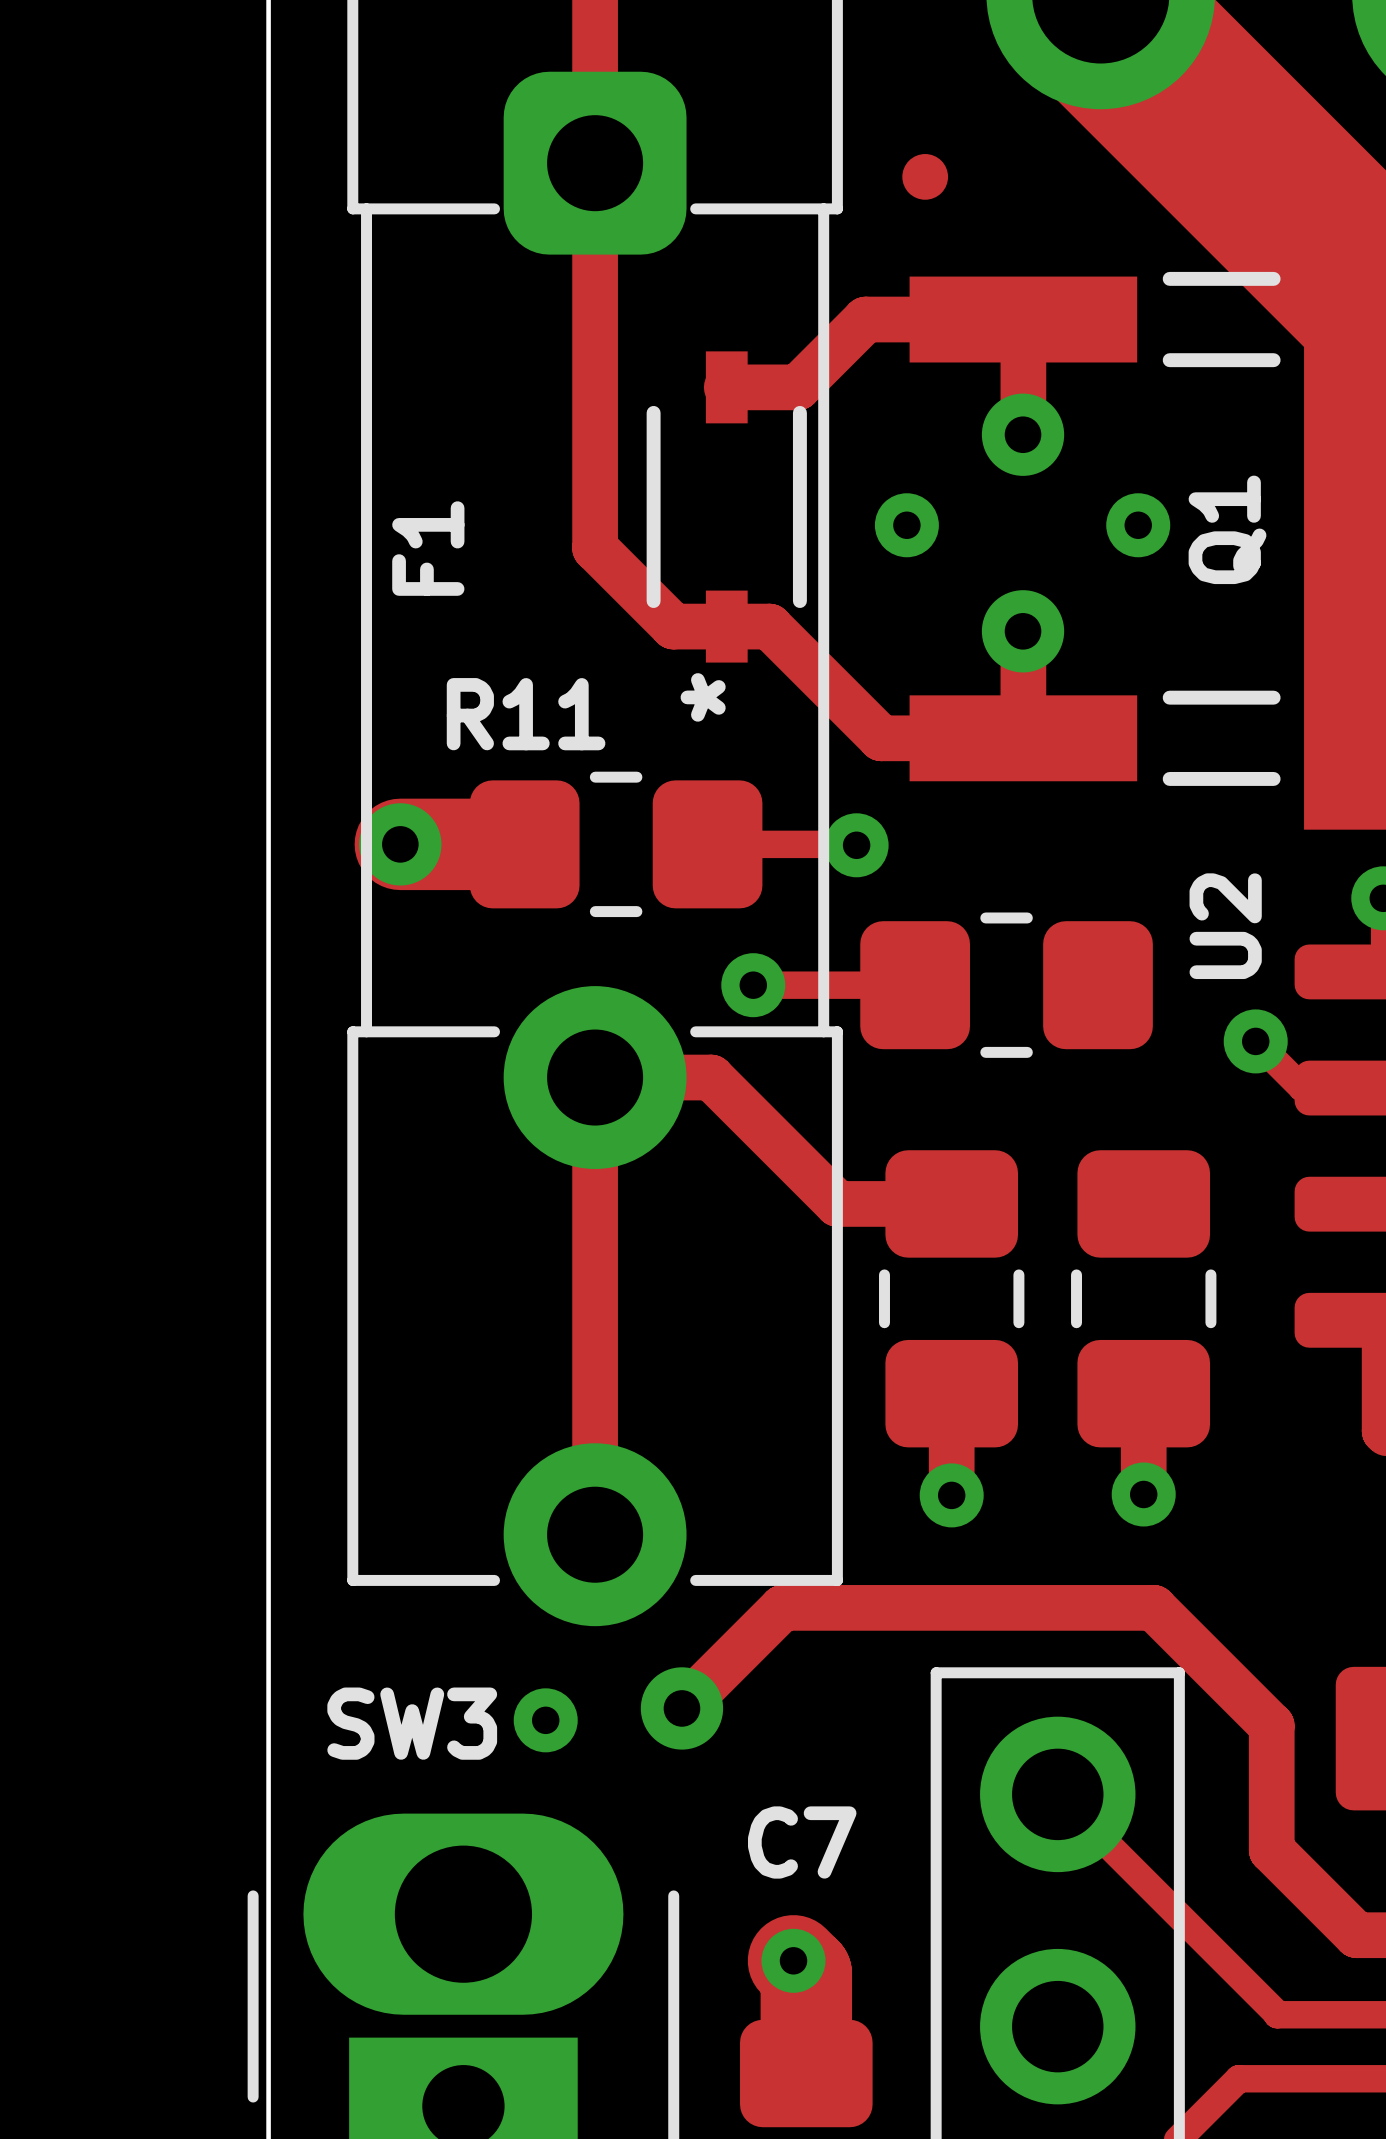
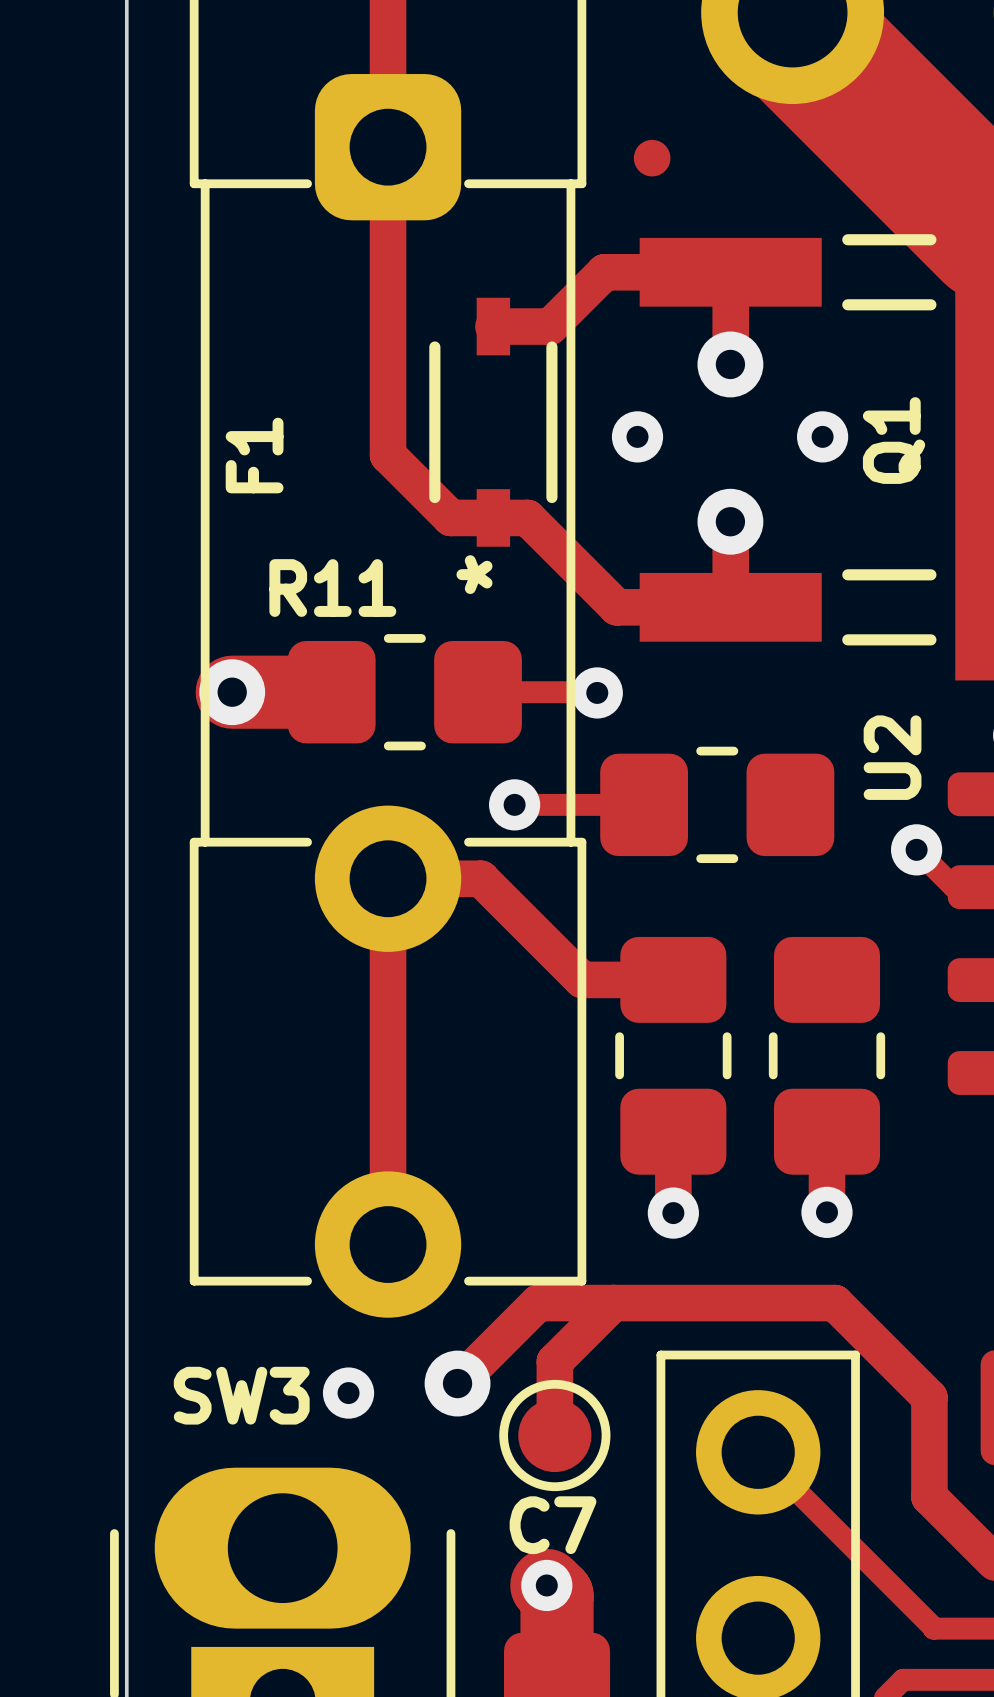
track: none -> (613, 1303) (554, 1361) (554, 1435)
part: none -> (554, 1435)
C7 name position: C7 (802, 1842) -> C7 (553, 1525)

